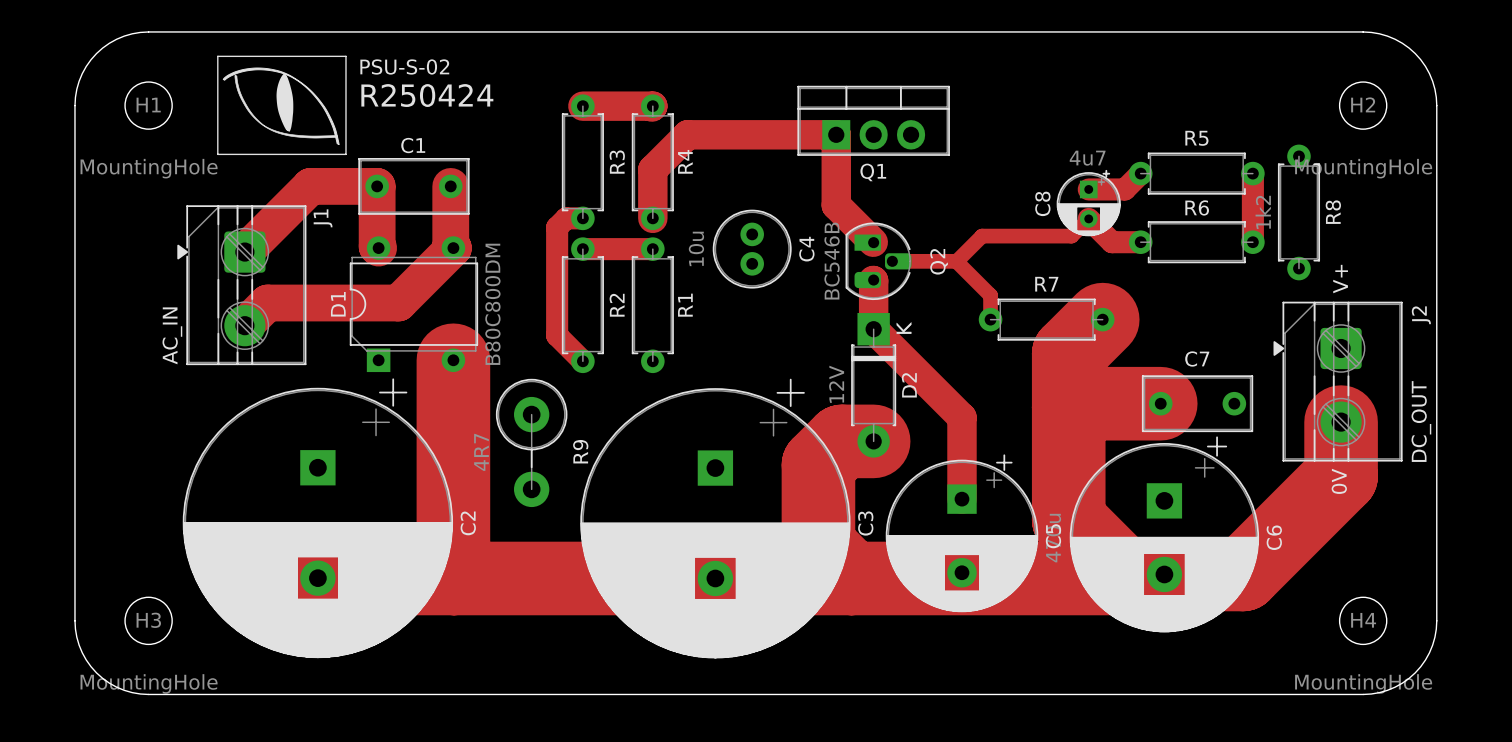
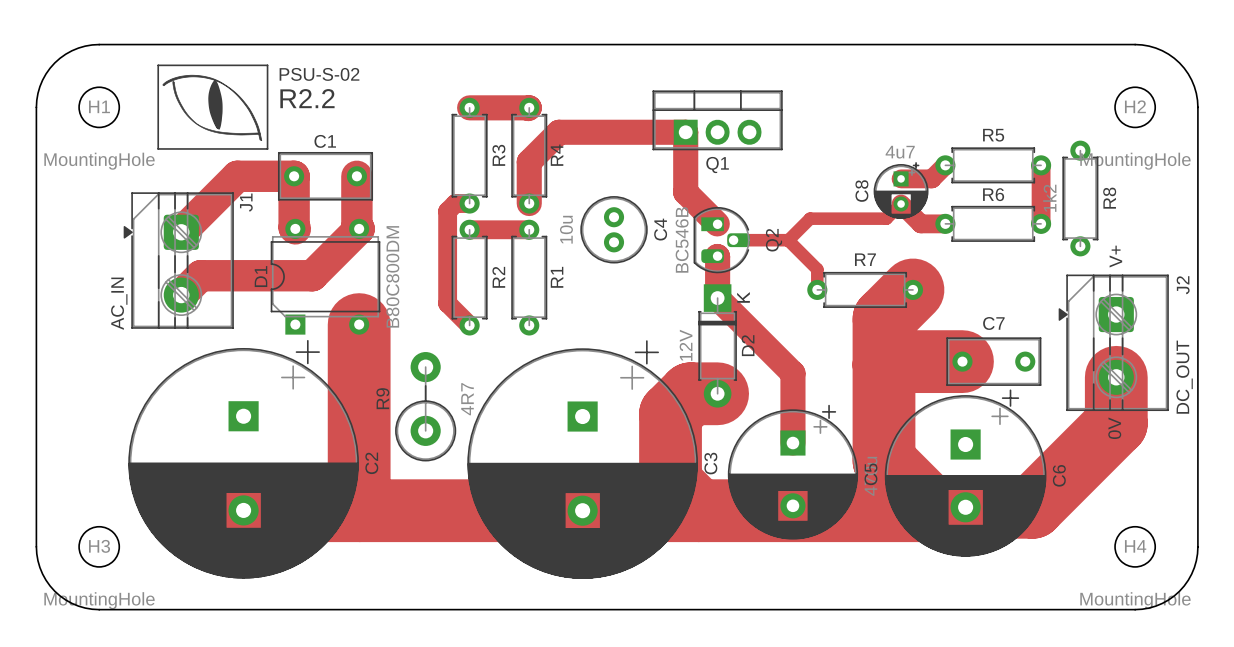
text: R250424 (427, 95) -> R2.2 (307, 98)
R9 rotation: 0° (531, 442) -> 180° (425, 406)

